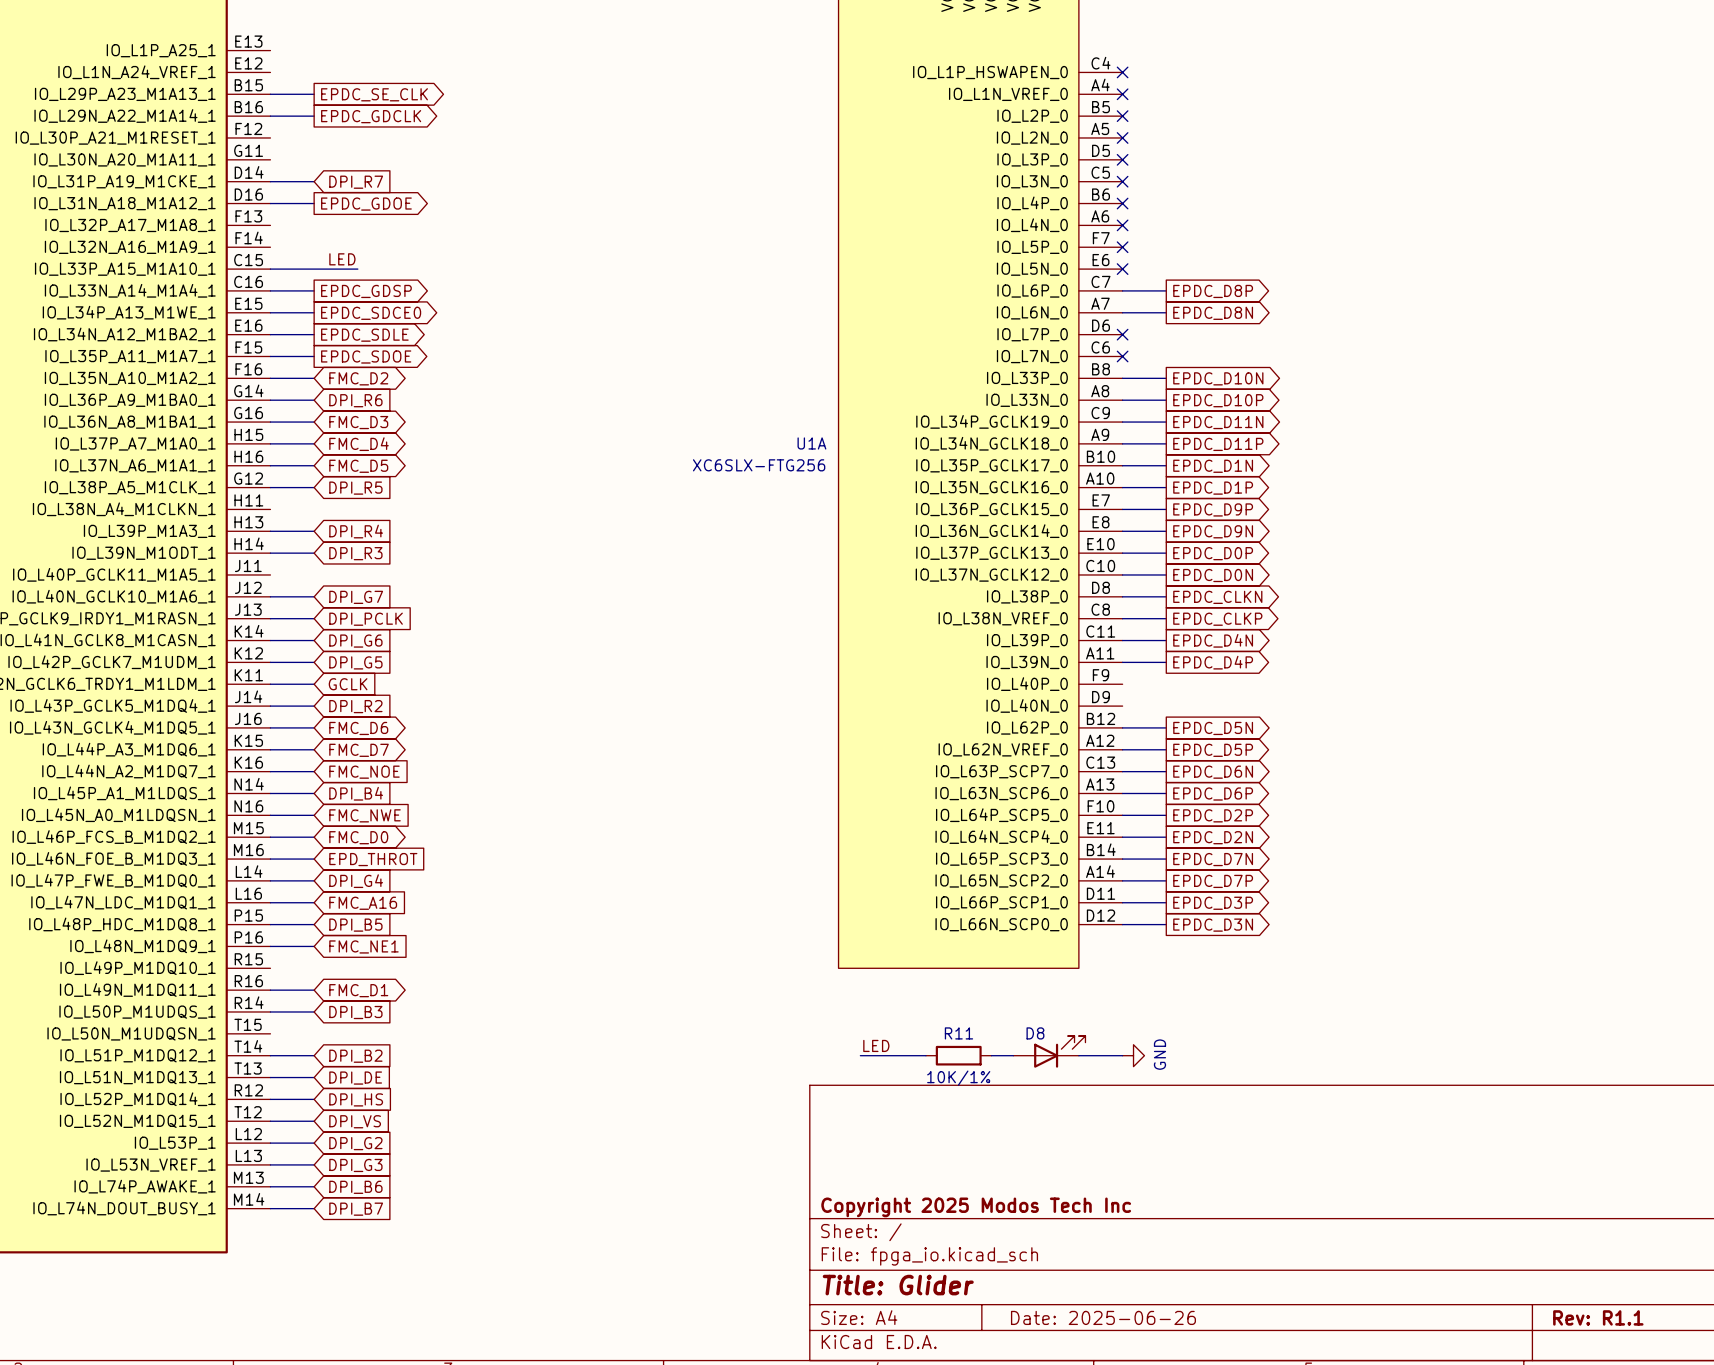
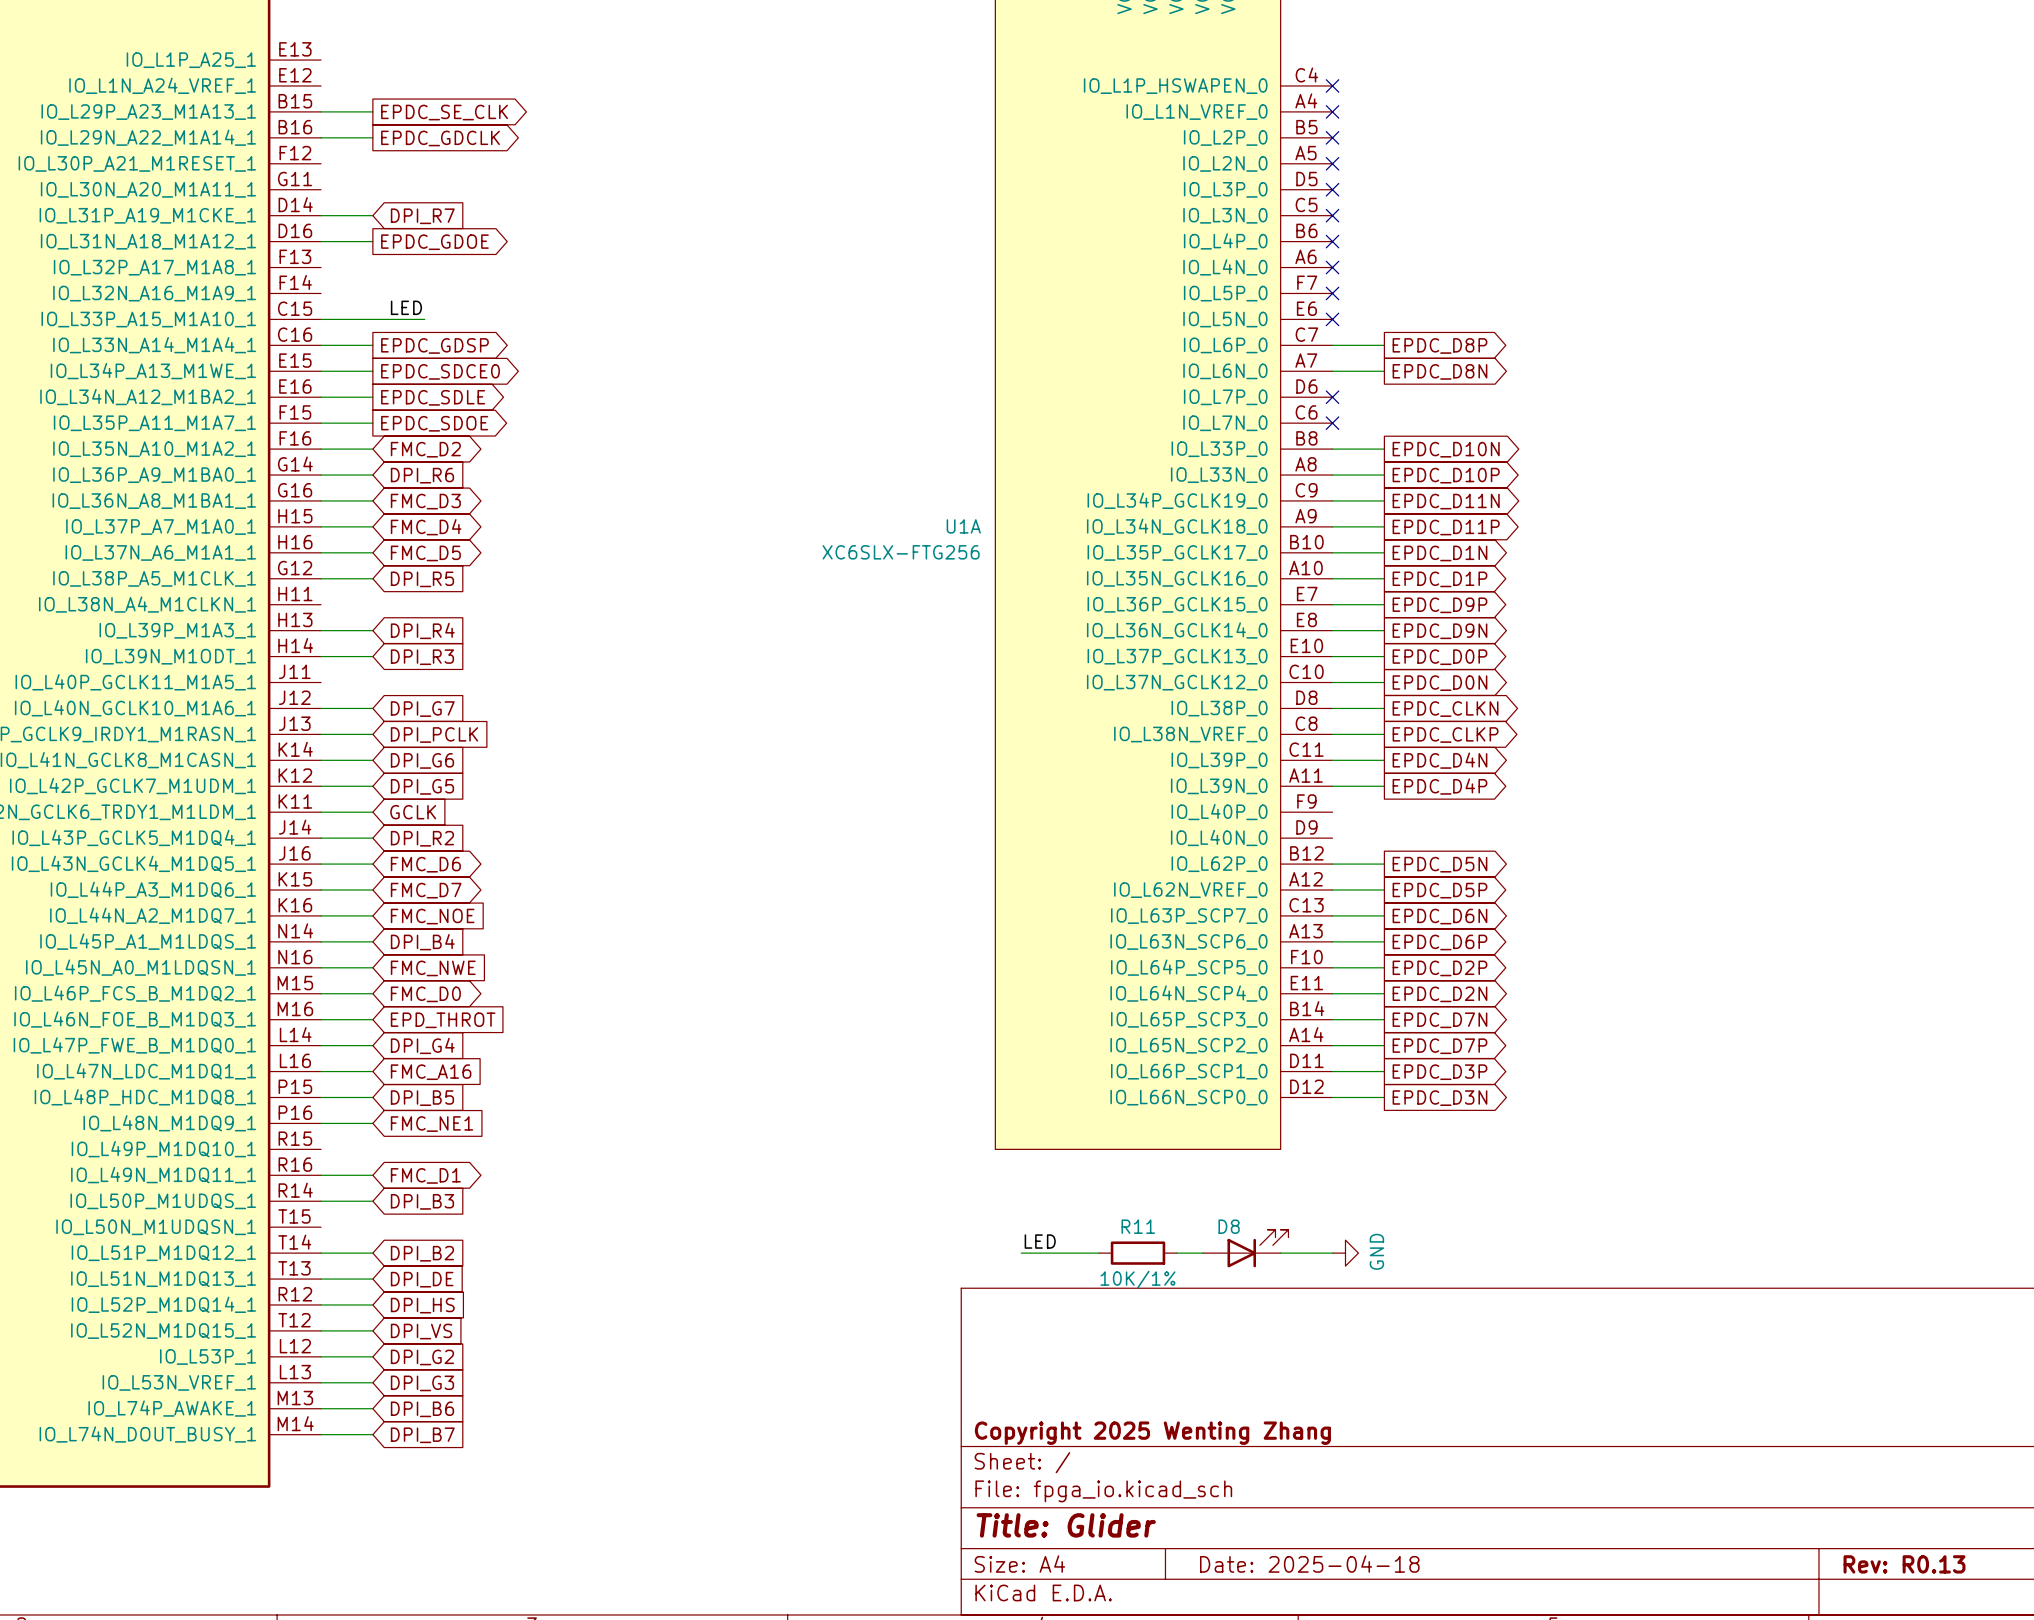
title block: Copyright 2025 Modos Tech Inc (976, 1207) -> Copyright 2025 Wenting Zhang (1152, 1433)
title block: Date: 2025-06-26 (1103, 1317) -> Date: 2025-04-18 (1309, 1564)
title block: Rev: R1.1 (1598, 1317) -> Rev: R0.13 (1904, 1564)

